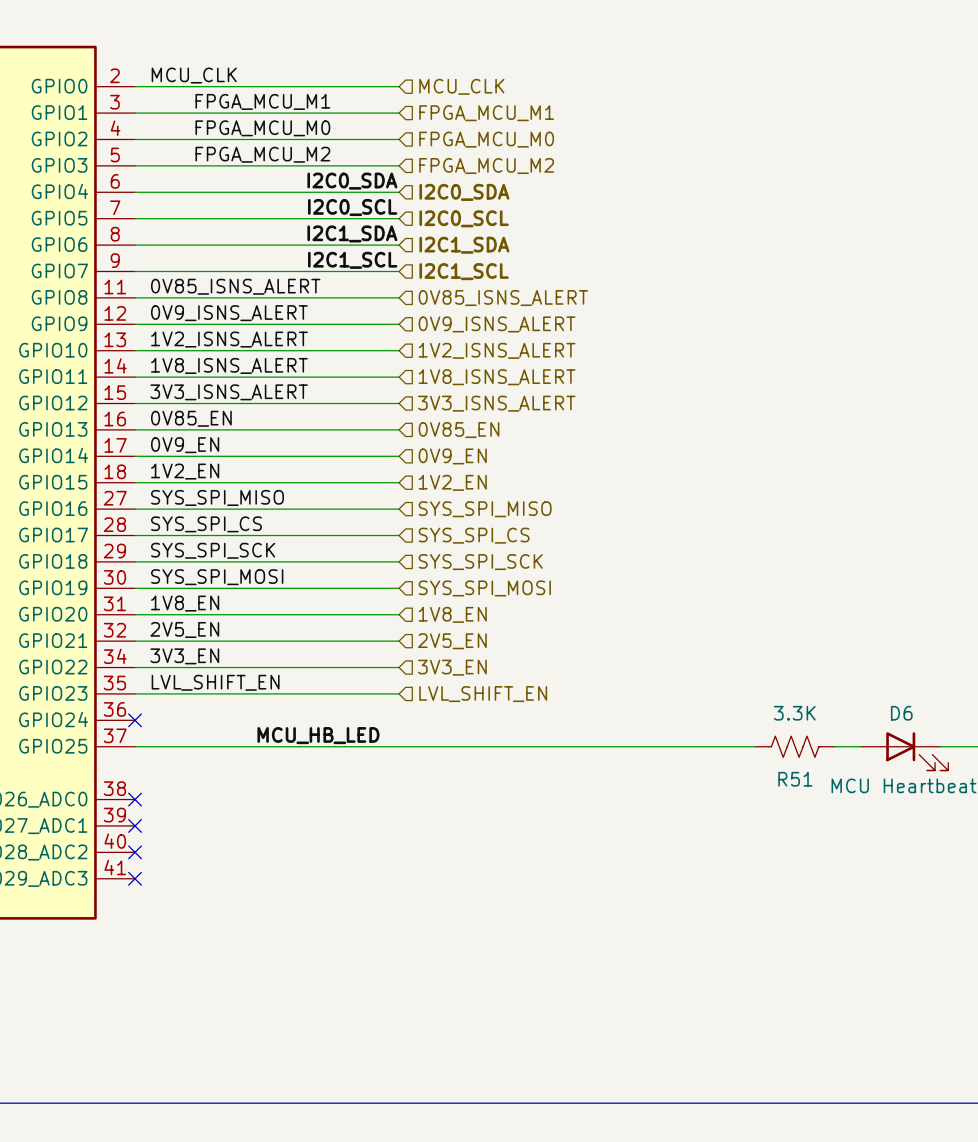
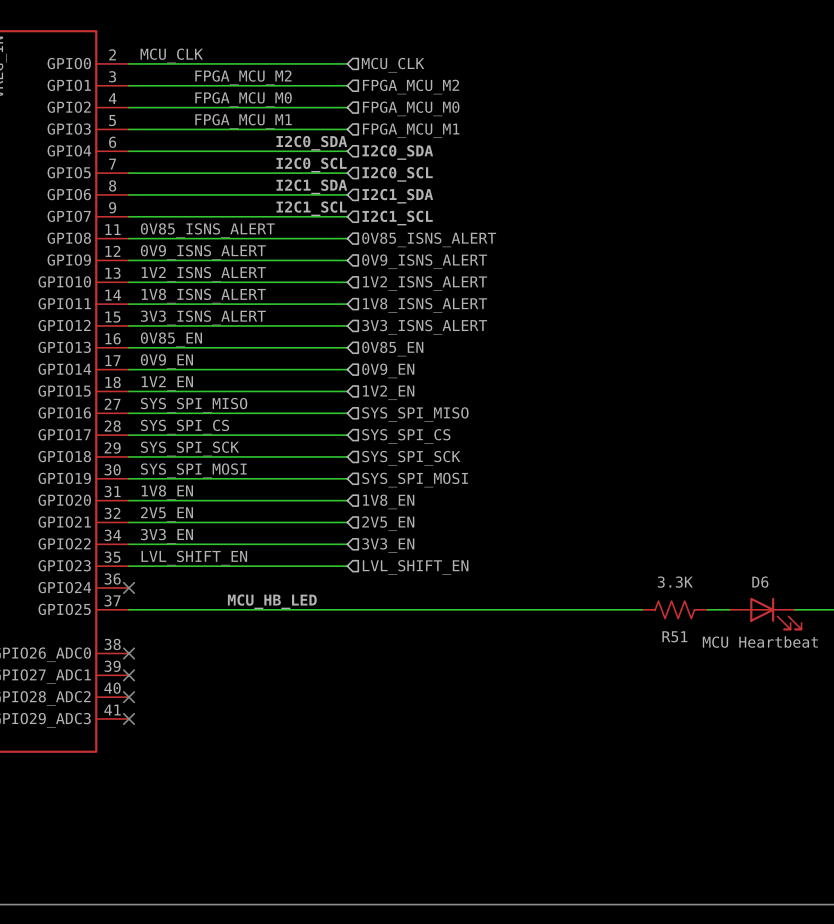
label: FPGA_MCU_M1 (262, 101) -> FPGA_MCU_M2 (243, 77)
hierarchical label: FPGA_MCU_M1 (486, 113) -> FPGA_MCU_M2 (411, 87)
label: FPGA_MCU_M2 (262, 154) -> FPGA_MCU_M1 (243, 121)
hierarchical label: FPGA_MCU_M2 (486, 166) -> FPGA_MCU_M1 (411, 130)

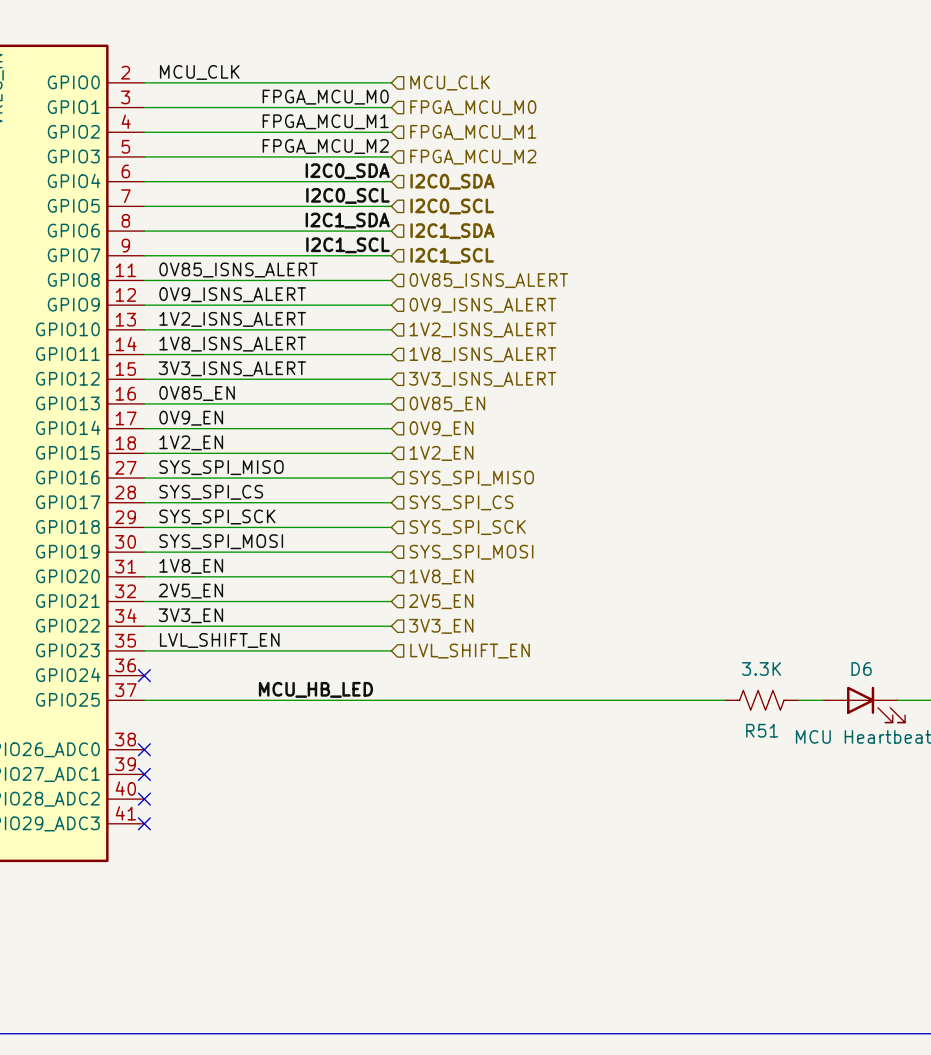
label position: FPGA_MCU_M2 (243, 77) -> FPGA_MCU_M2 (325, 146)
hierarchical label: FPGA_MCU_M2 (411, 87) -> FPGA_MCU_M0 (473, 107)
label position: FPGA_MCU_M0 (243, 99) -> FPGA_MCU_M0 (325, 97)
hierarchical label: FPGA_MCU_M0 (411, 108) -> FPGA_MCU_M1 (473, 132)
label position: FPGA_MCU_M1 (243, 121) -> FPGA_MCU_M1 (325, 121)
hierarchical label: FPGA_MCU_M1 (411, 130) -> FPGA_MCU_M2 (473, 157)

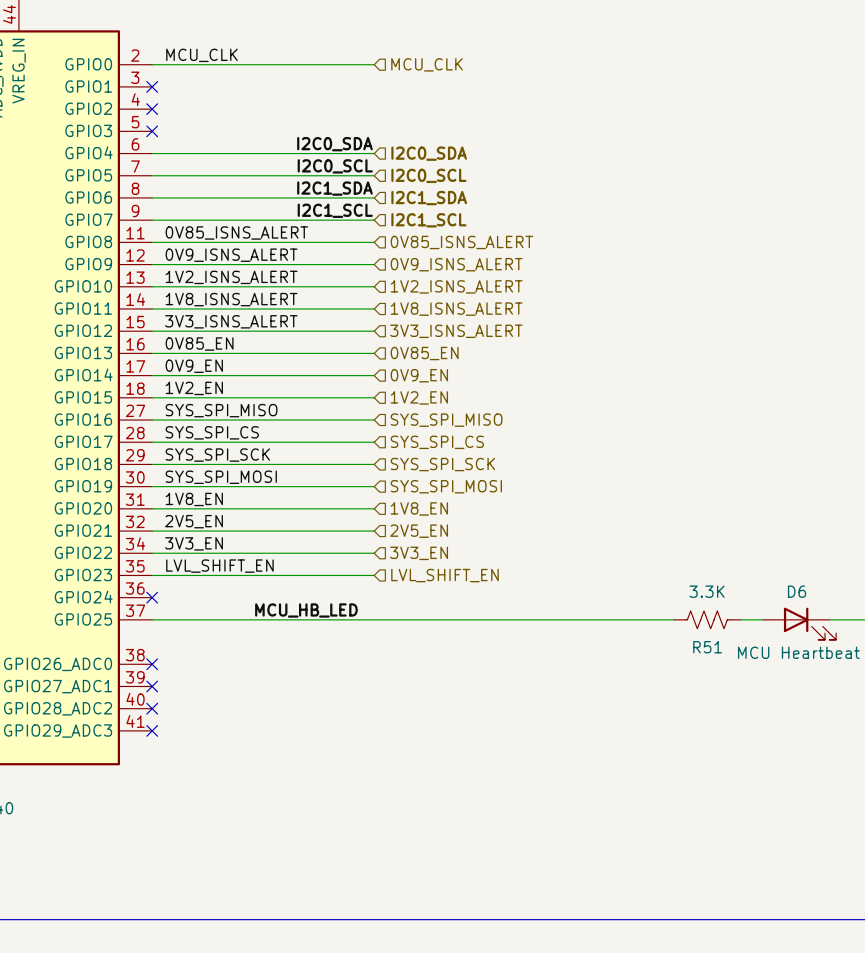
label: FPGA_MCU_M0 (325, 97) -> none
wire: (144, 107) (391, 107) -> none
no-connect mark: none -> (152, 86)
hierarchical label: FPGA_MCU_M0 (473, 107) -> none
label: FPGA_MCU_M1 (325, 121) -> none
wire: (144, 132) (391, 132) -> none
no-connect mark: none -> (152, 109)
hierarchical label: FPGA_MCU_M1 (473, 132) -> none
label: FPGA_MCU_M2 (325, 146) -> none
wire: (144, 156) (391, 156) -> none
no-connect mark: none -> (152, 131)
hierarchical label: FPGA_MCU_M2 (473, 157) -> none

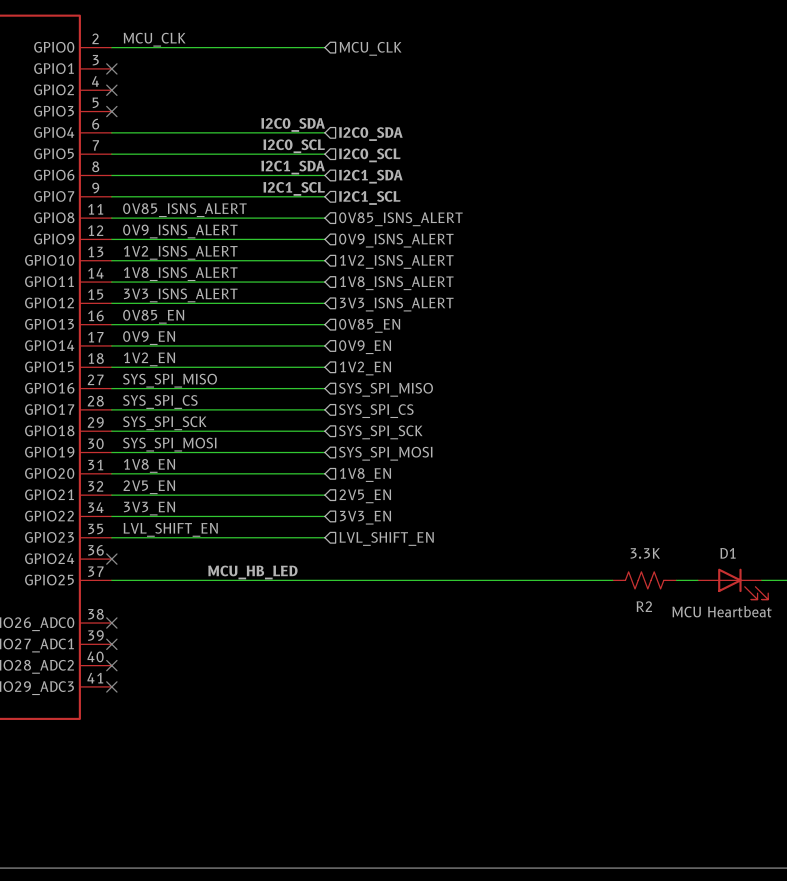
D6 name: D6 (797, 591) -> D1 (728, 553)
R51 name: R51 (707, 647) -> R2 (644, 606)

